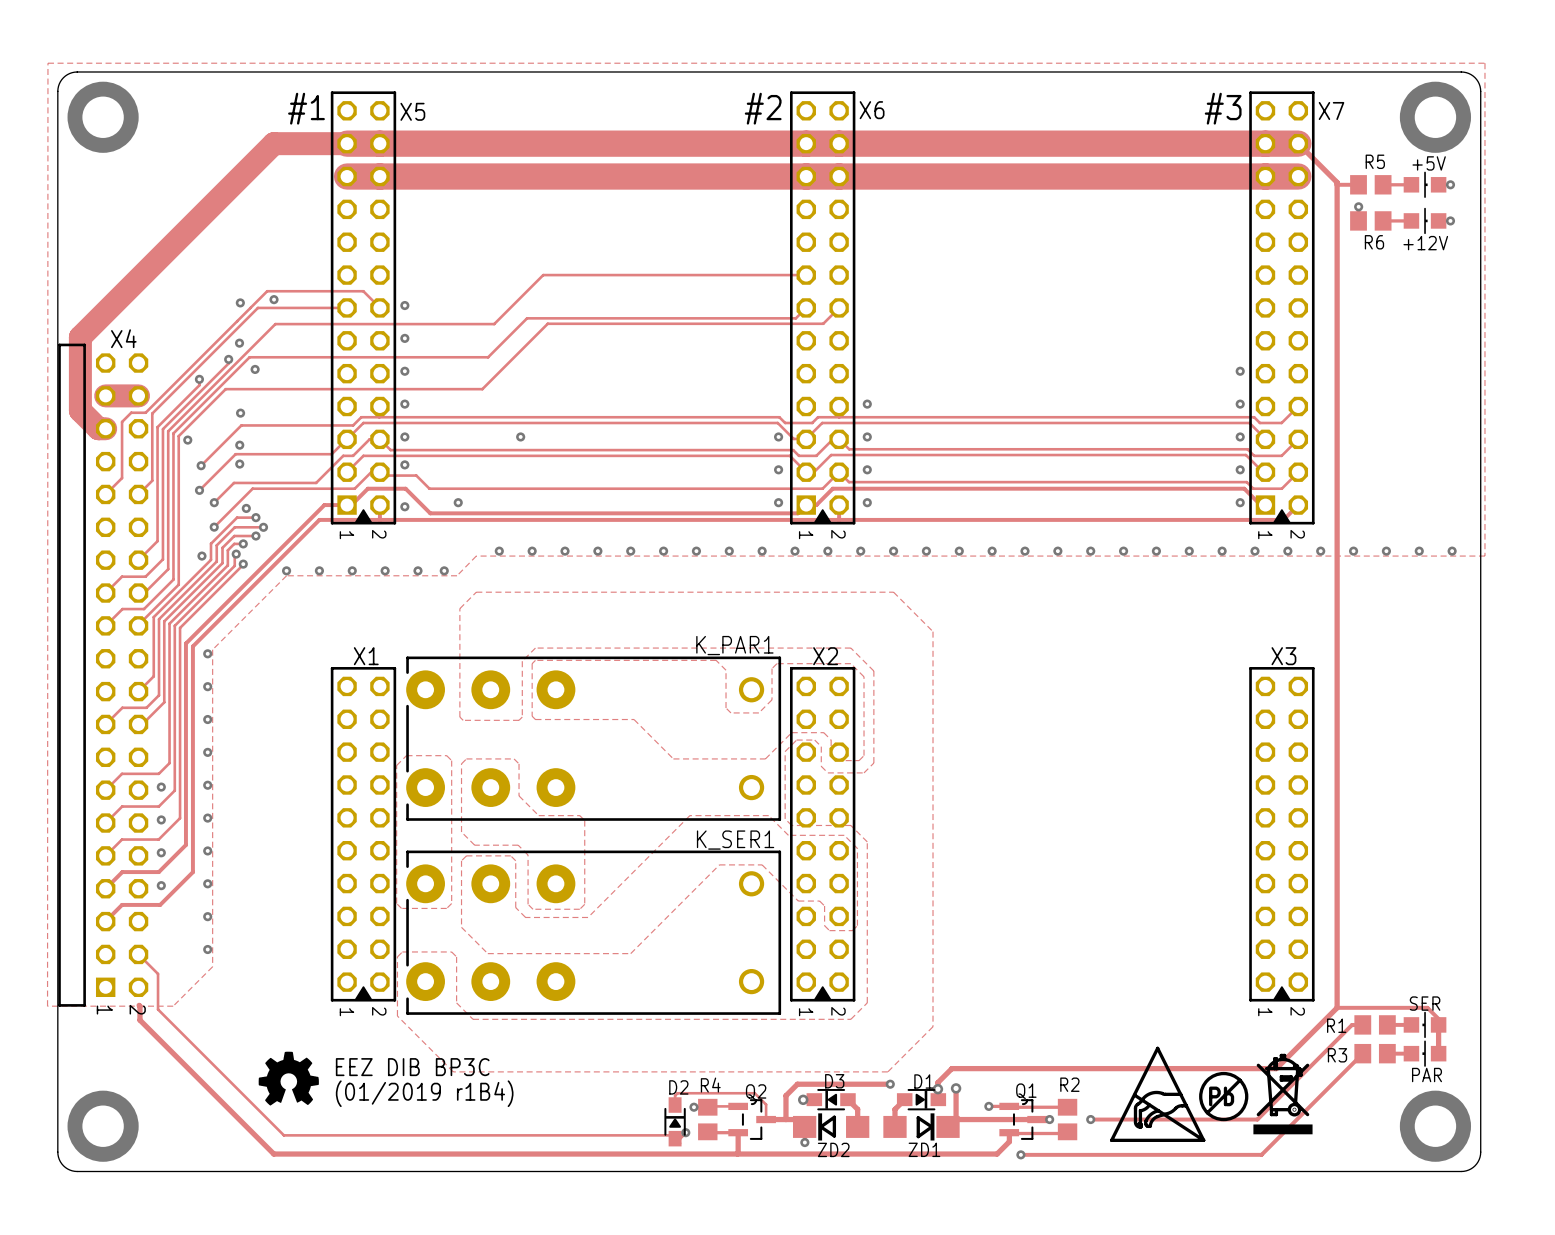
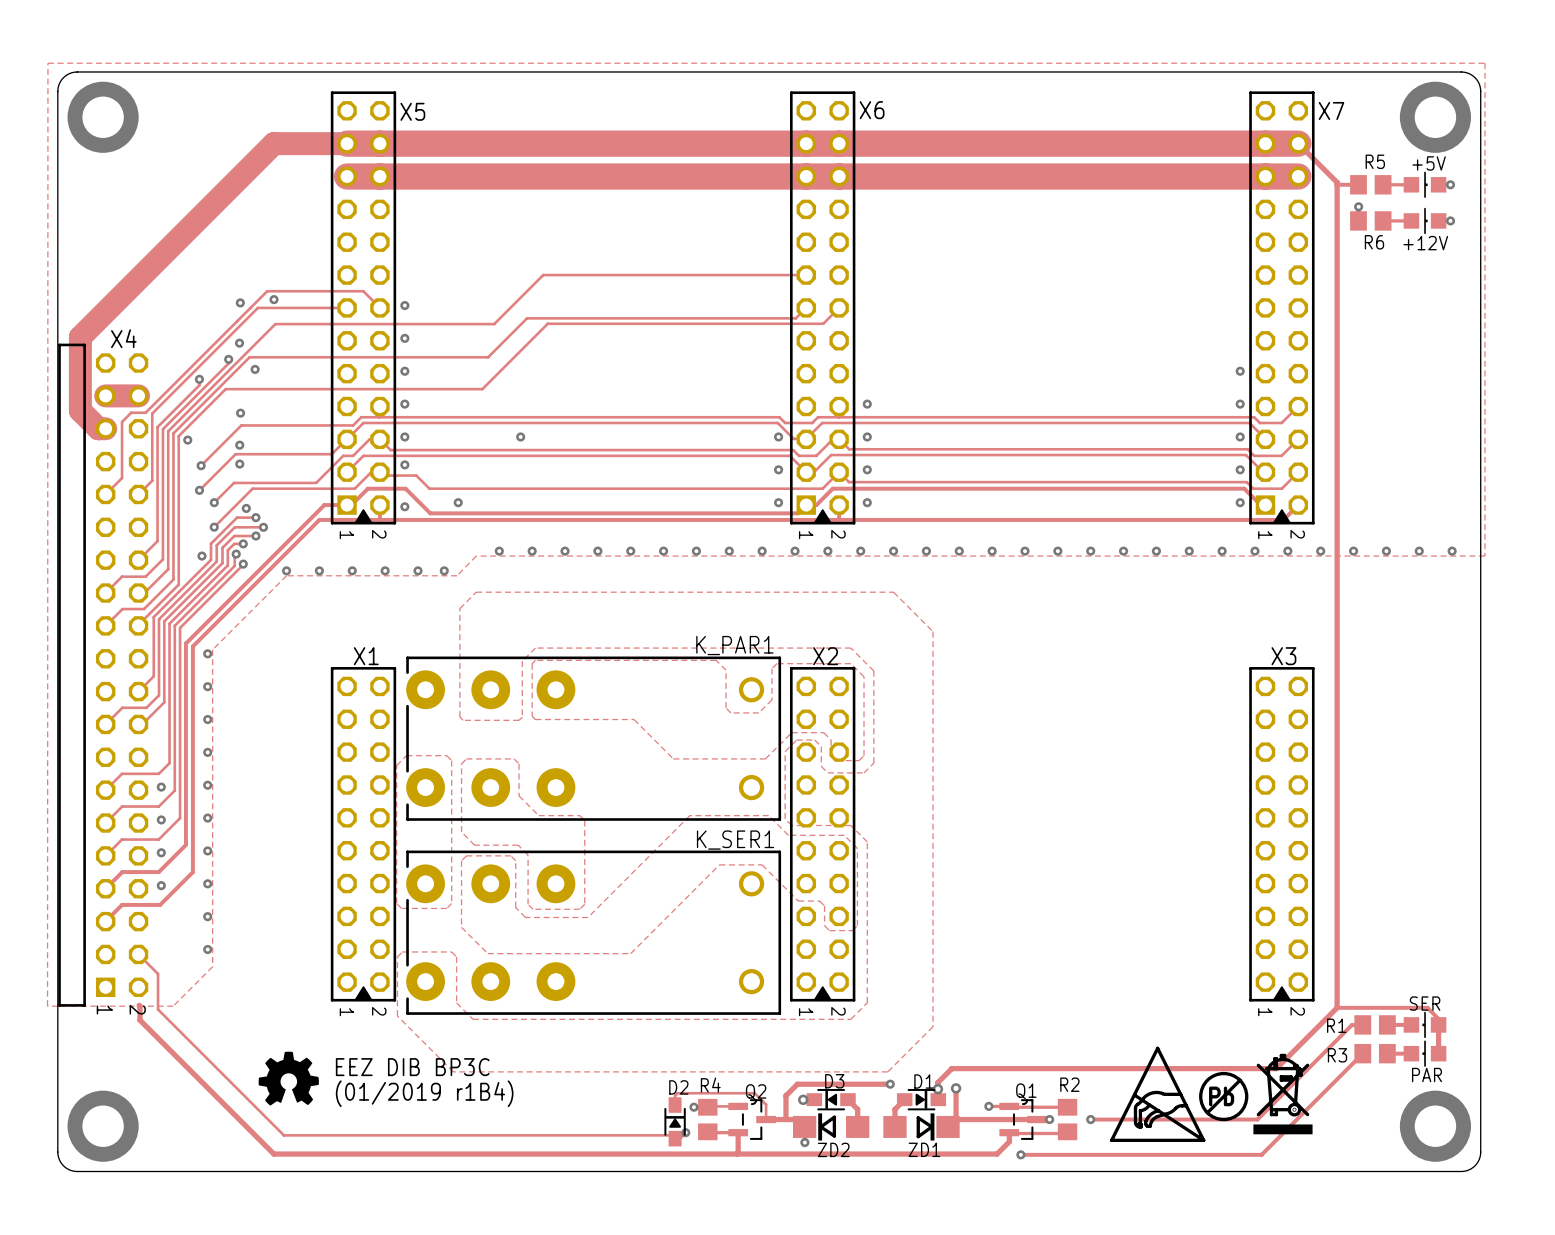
text: #1 (306, 108) -> none
text: #2 (763, 108) -> none
text: #3 (1223, 108) -> none

